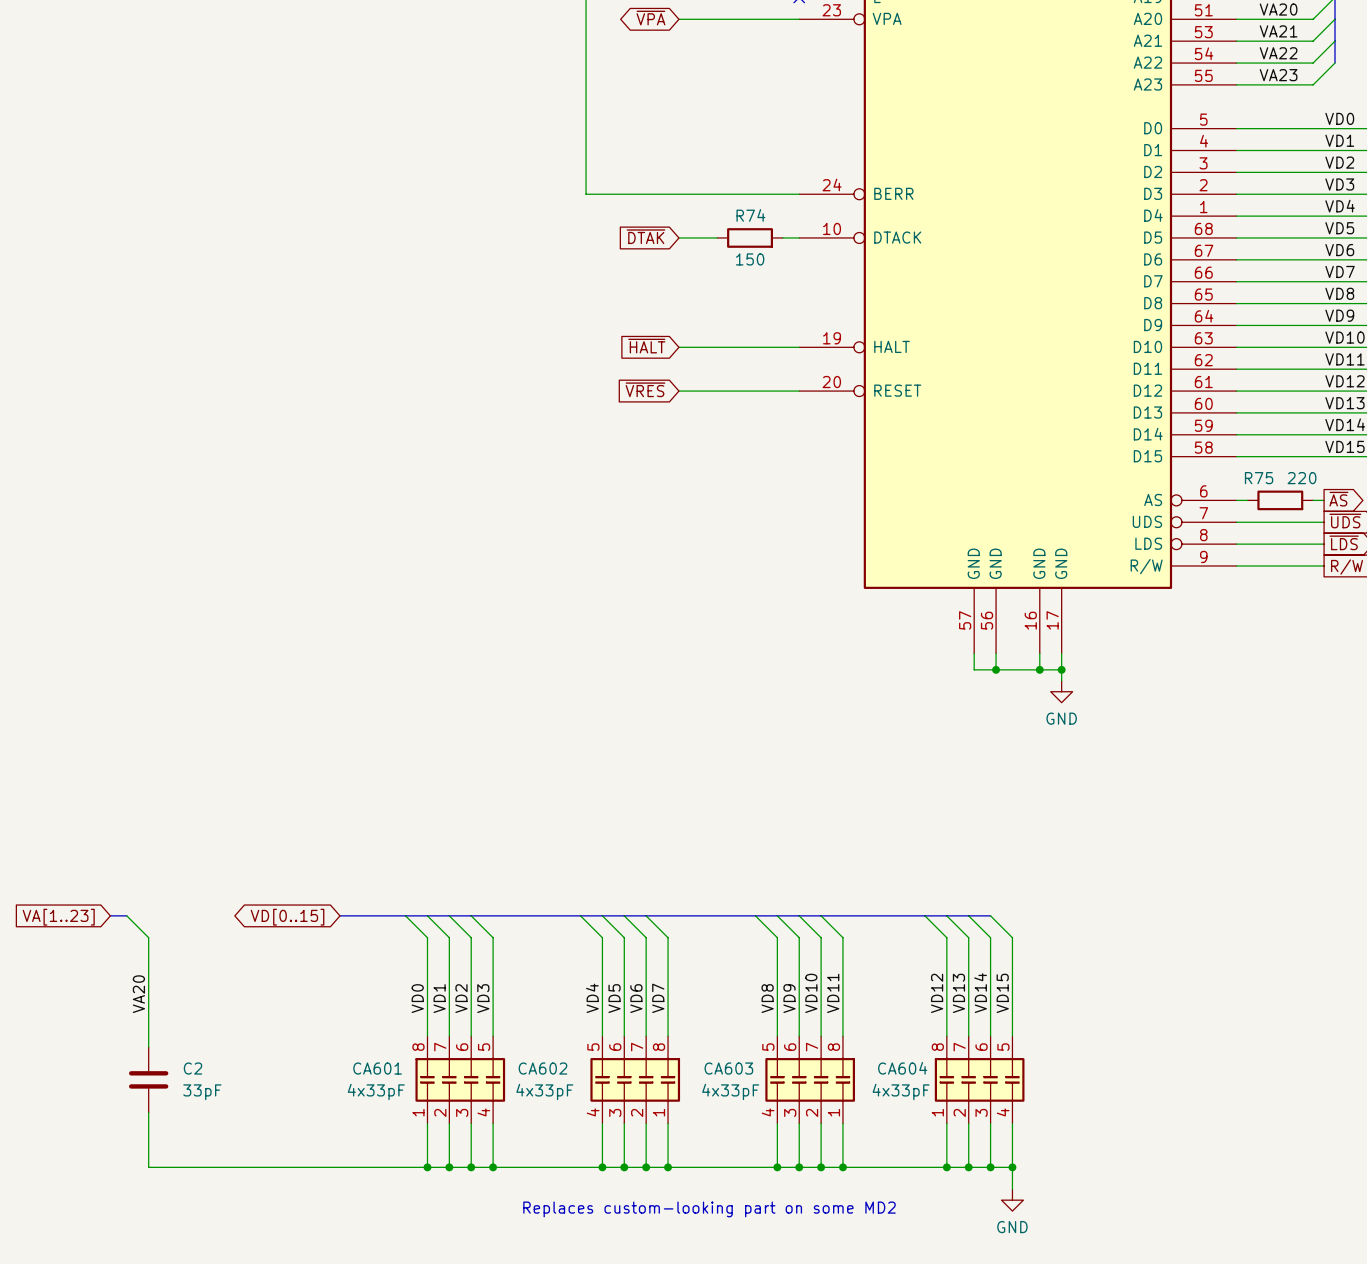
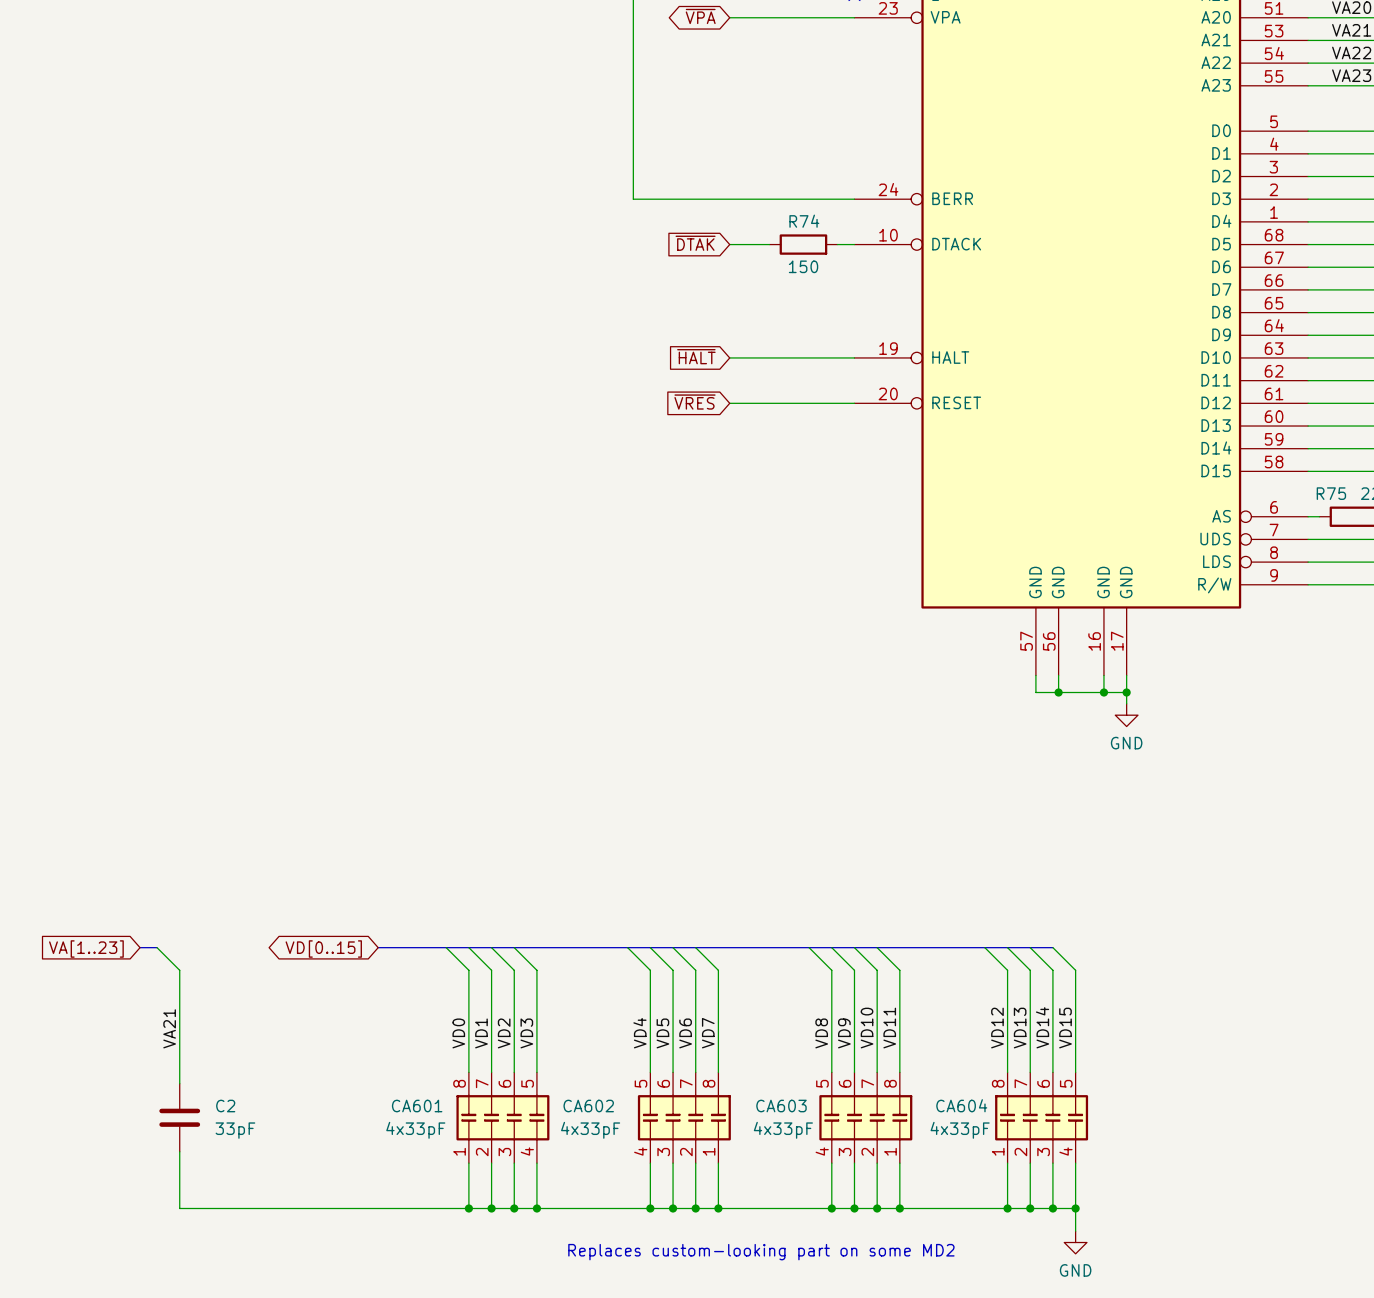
label: VA20 (138, 994) -> VA21 (169, 1028)

